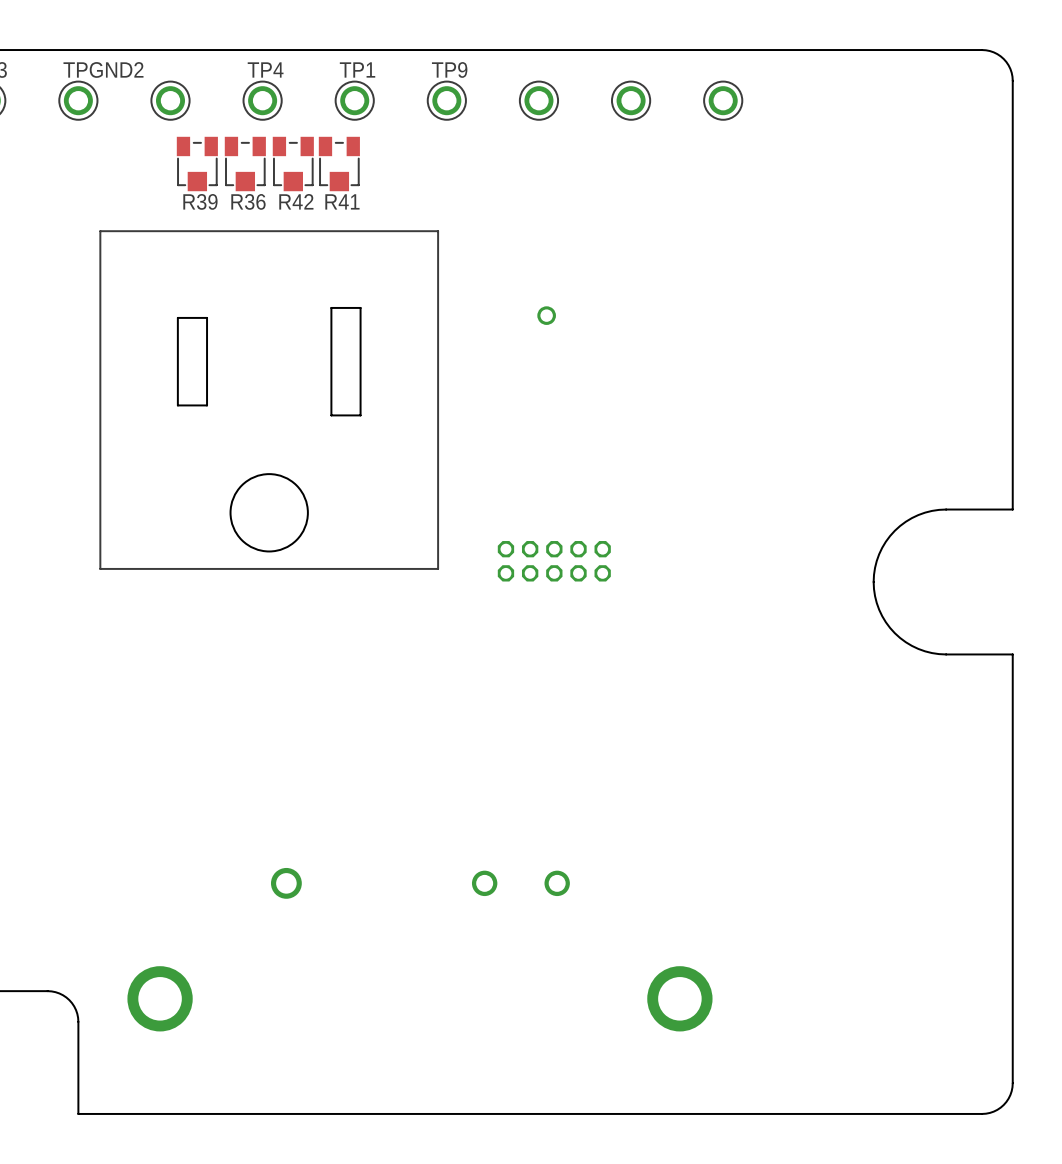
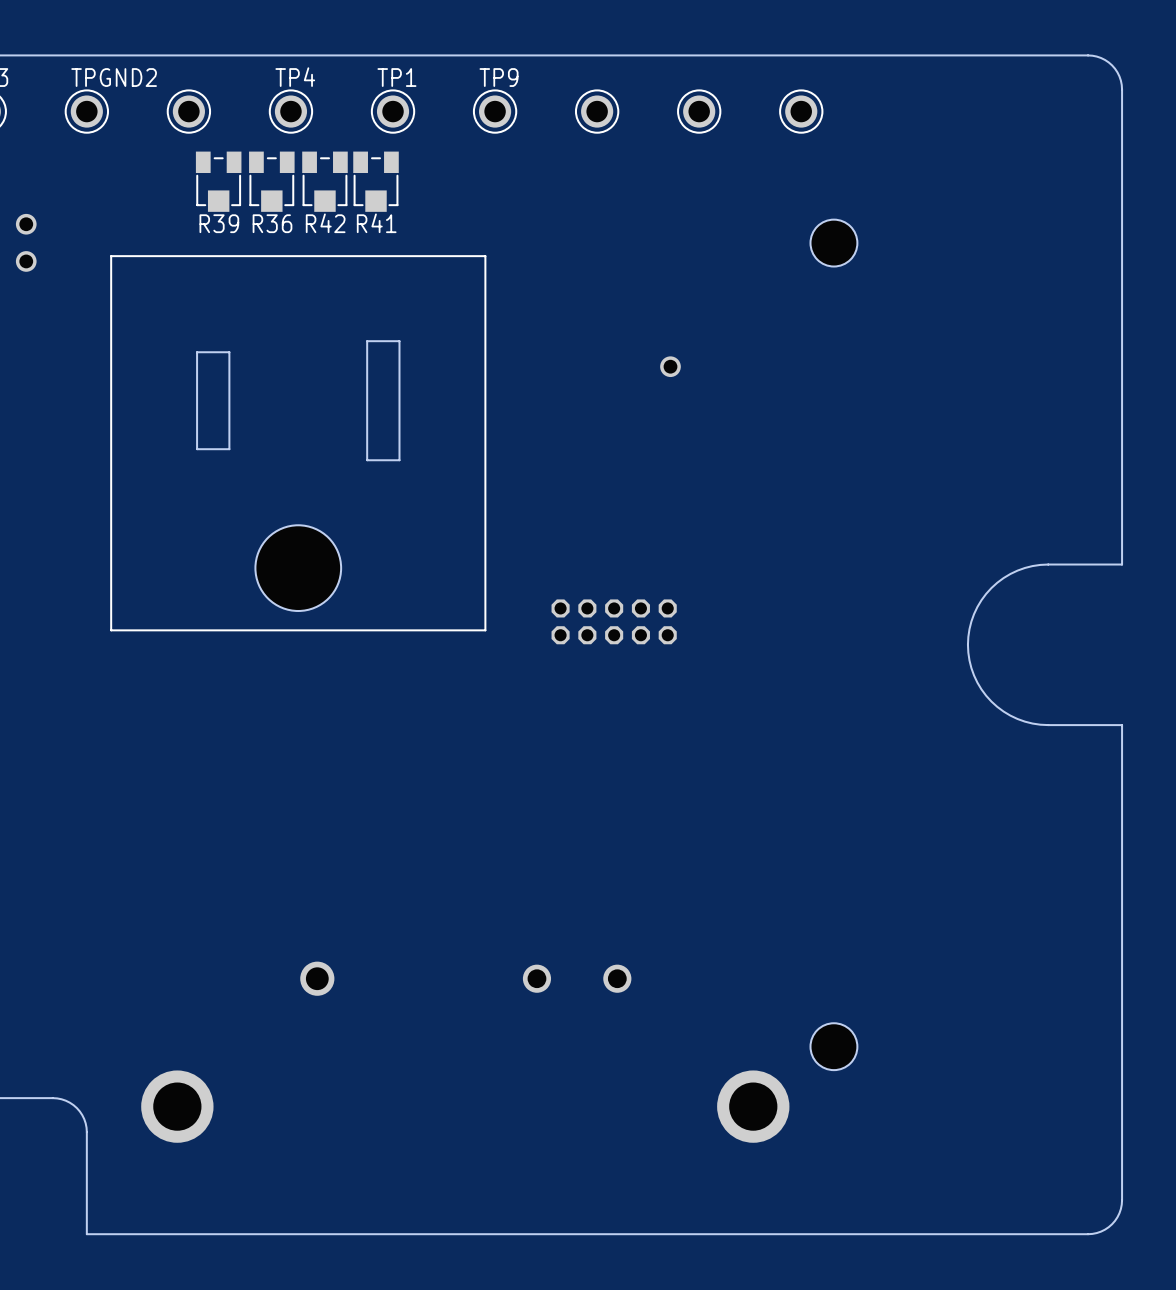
part: none -> (26, 224)
hole: none -> (833, 243)
part: none -> (26, 261)
part position: (546, 315) -> (670, 366)
hole: none -> (833, 1046)

